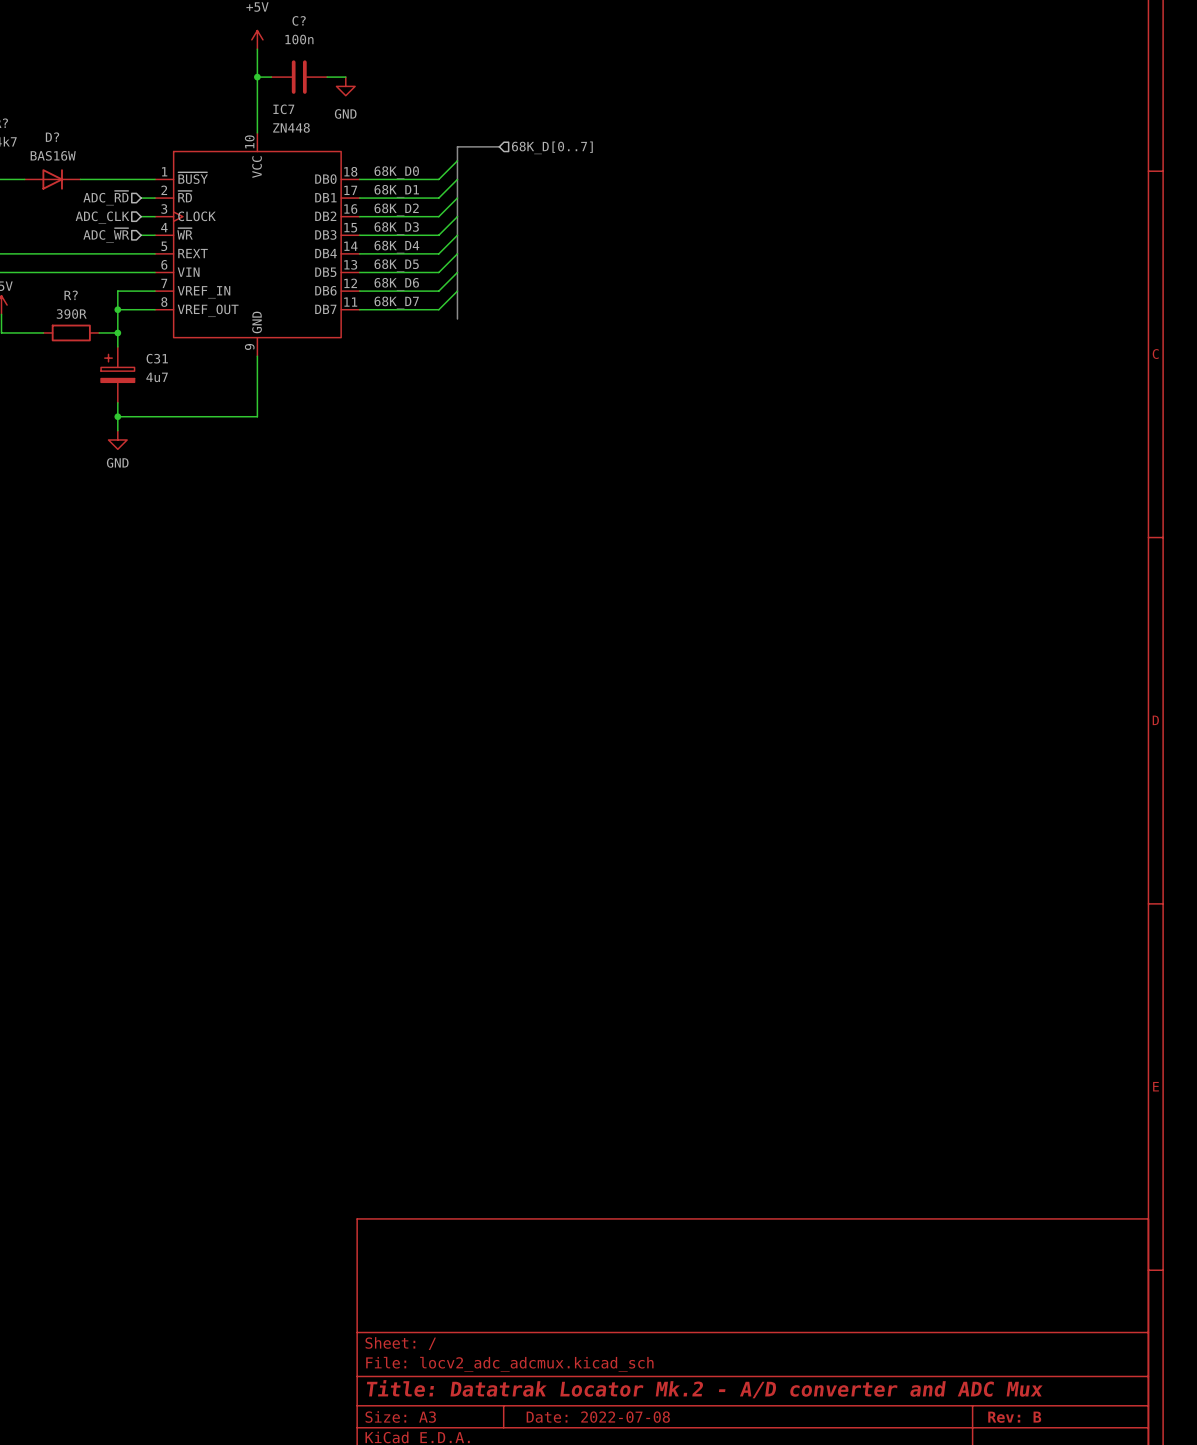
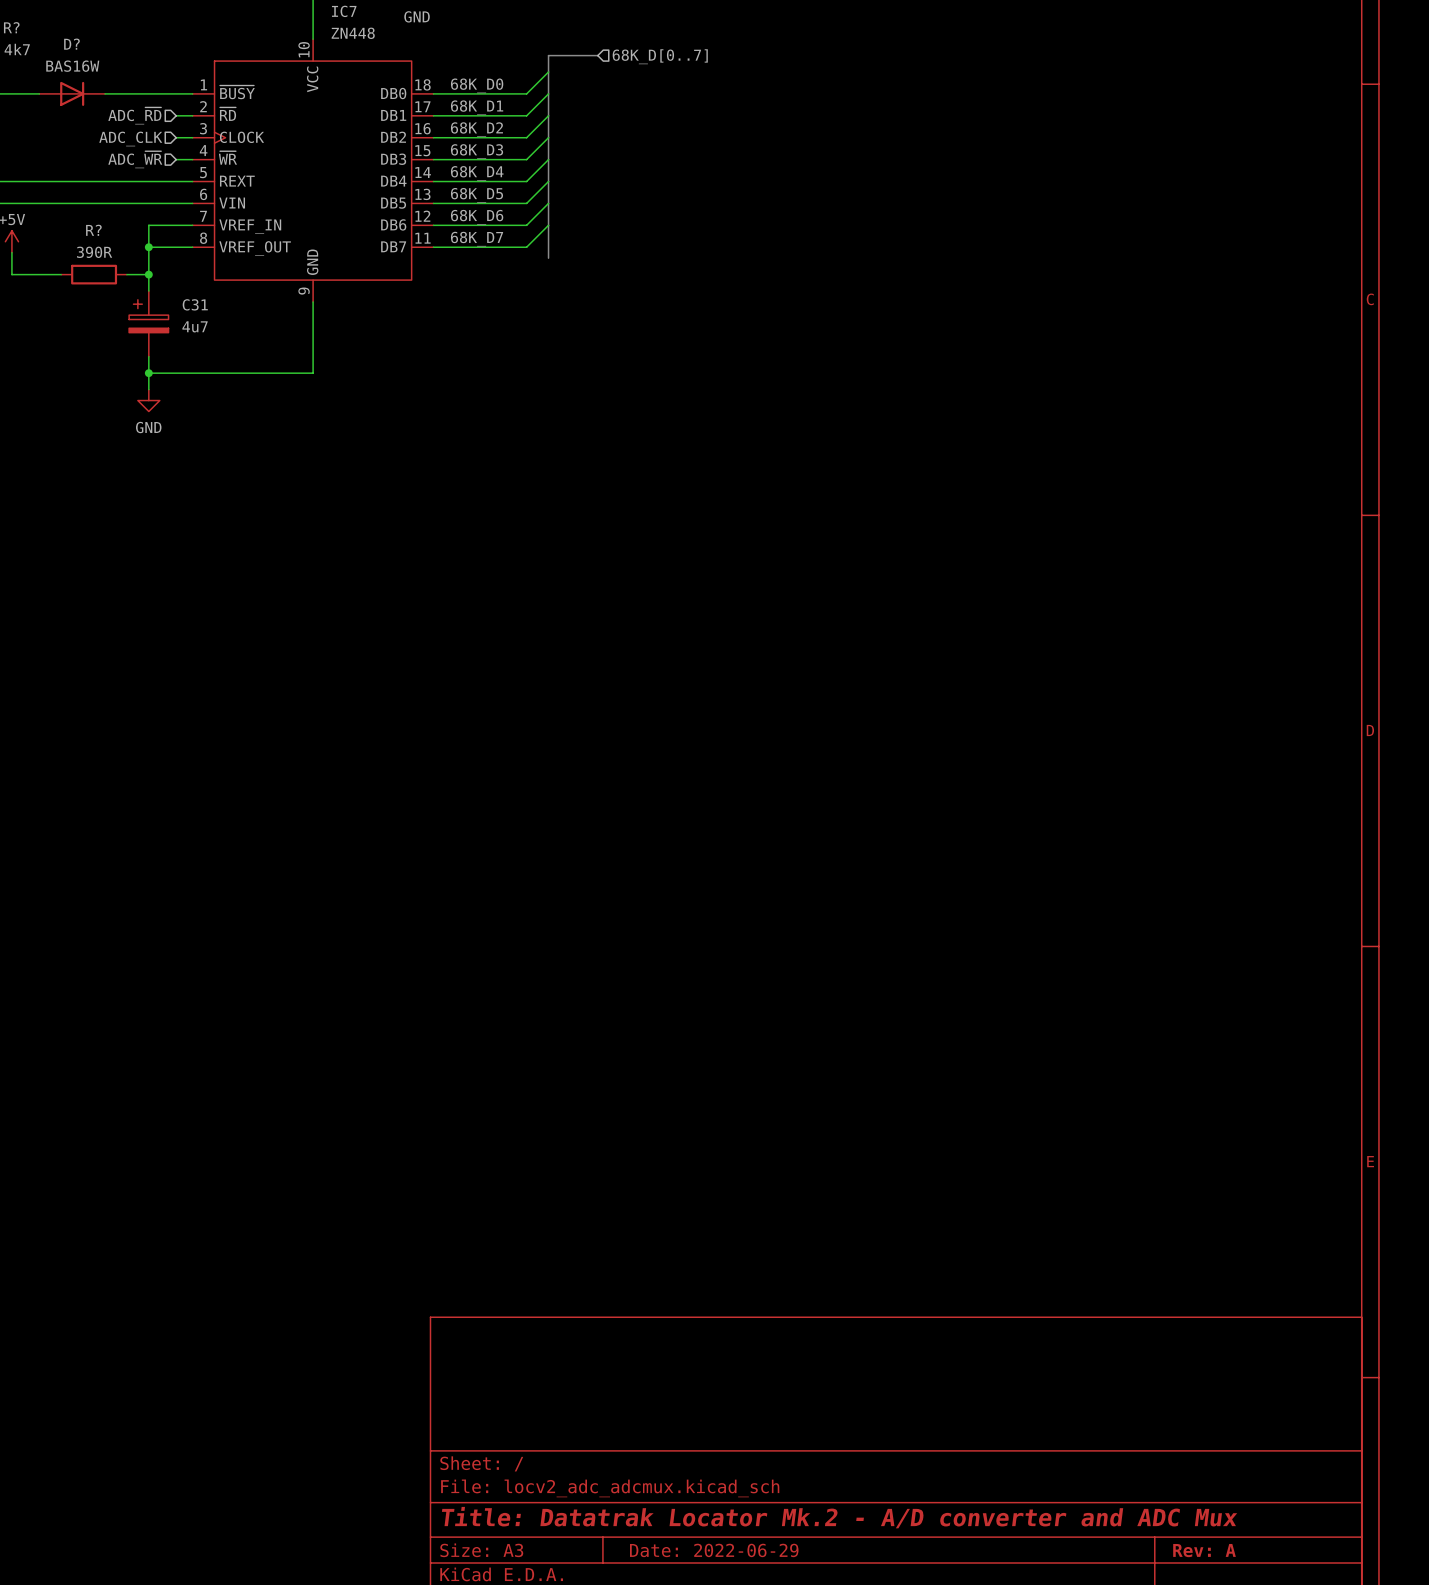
title block: Date: 2022-07-08 (598, 1417) -> Date: 2022-06-29 (714, 1550)
title block: Rev: B (1014, 1417) -> Rev: A (1204, 1550)

